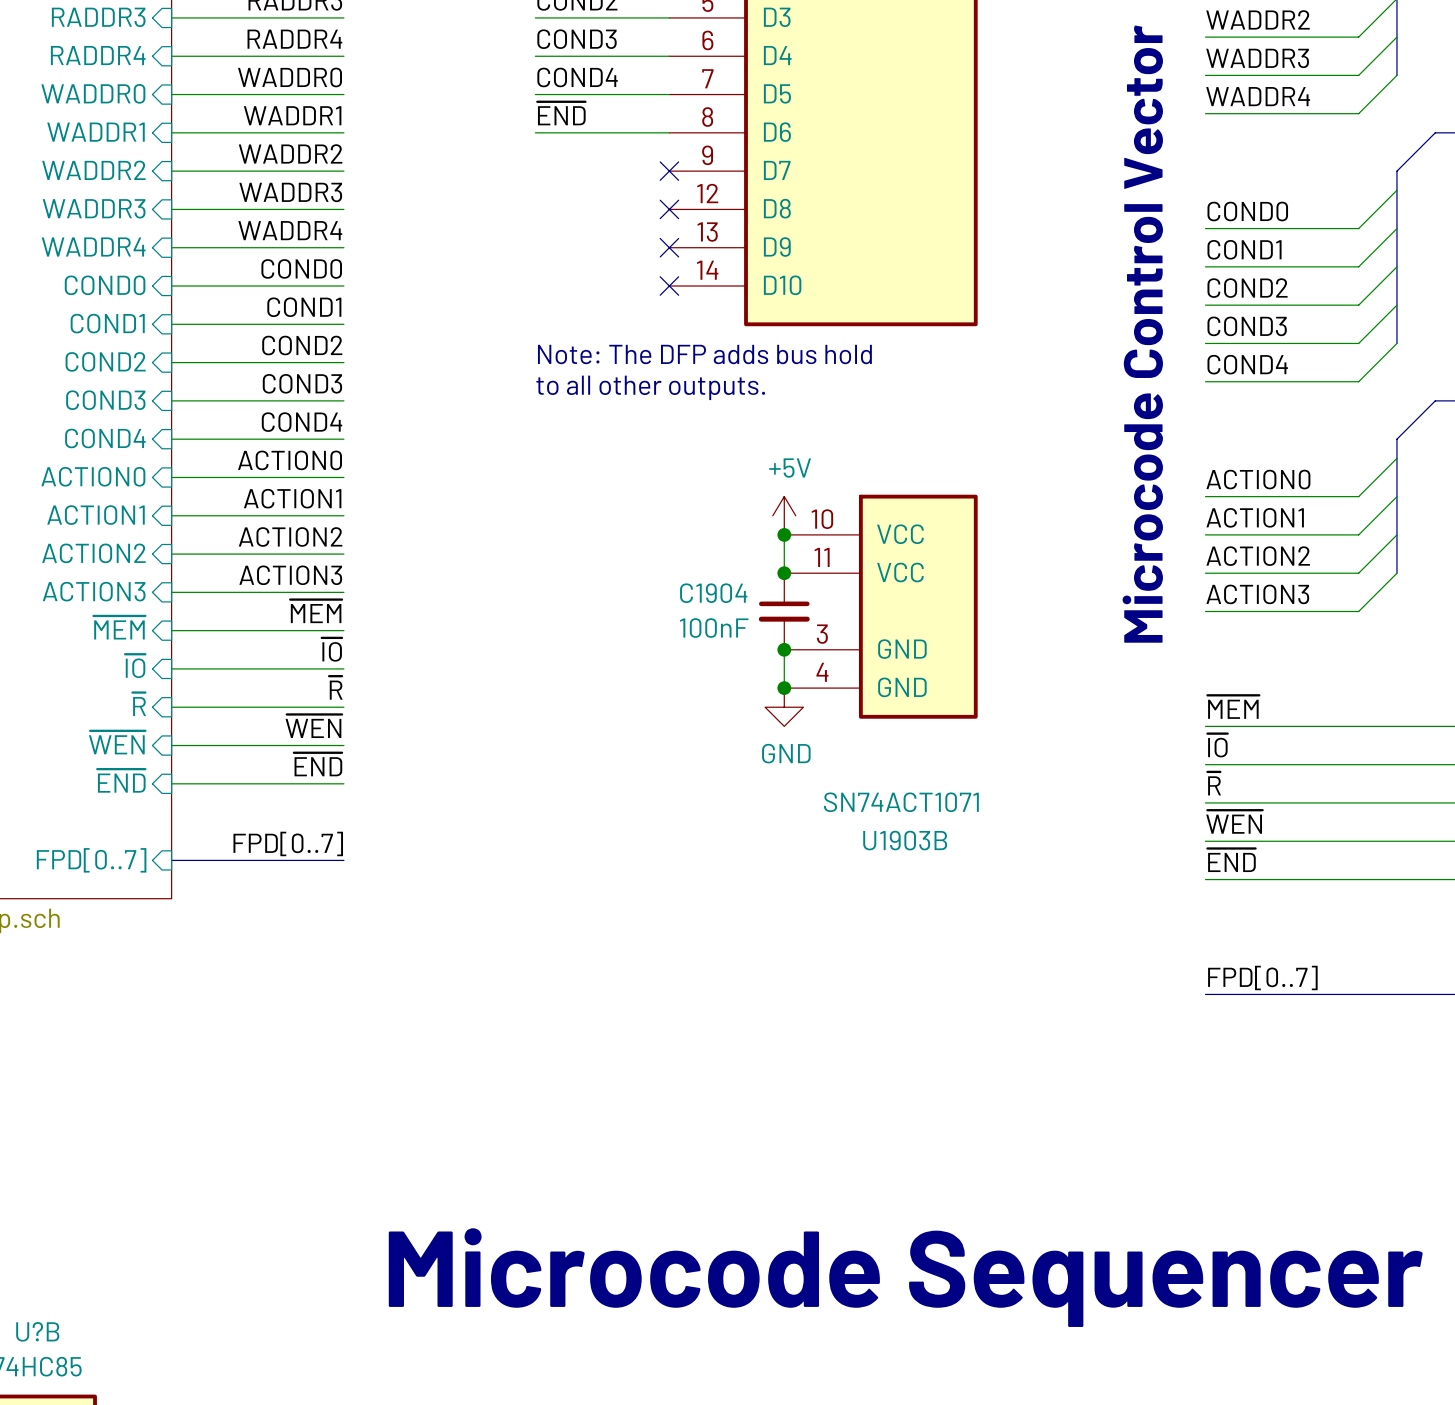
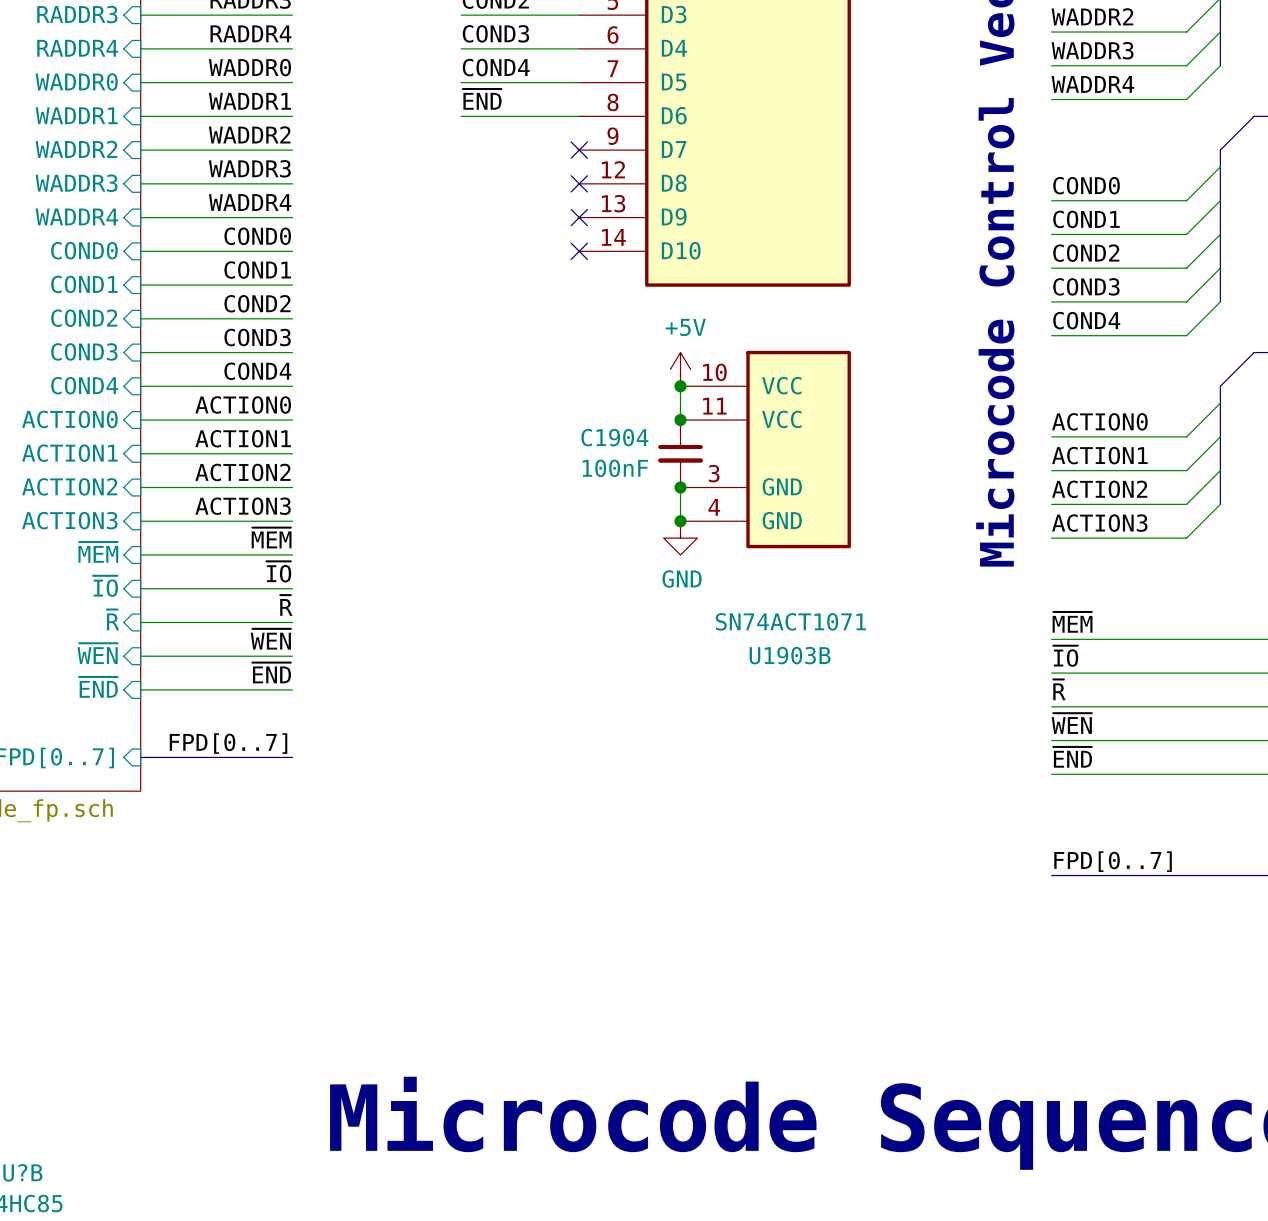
text: Note: The DFP adds bus hold (704, 354) -> none
text: to all other outputs. (650, 387) -> none
junction: none -> (680, 386)
junction: none -> (680, 420)
power symbol position: +5V (784, 515) -> +5V (680, 369)
junction: (784, 534) -> none
junction: none -> (680, 487)
junction: (784, 573) -> none
junction: none -> (680, 521)
U1903B position: (880, 606) -> (765, 449)
C1904 position: (784, 611) -> (680, 453)
wire: (784, 649) (784, 688) -> (680, 386) (680, 420)
junction: (784, 649) -> none
junction: (784, 688) -> none
power symbol position: GND (784, 707) -> GND (680, 538)

